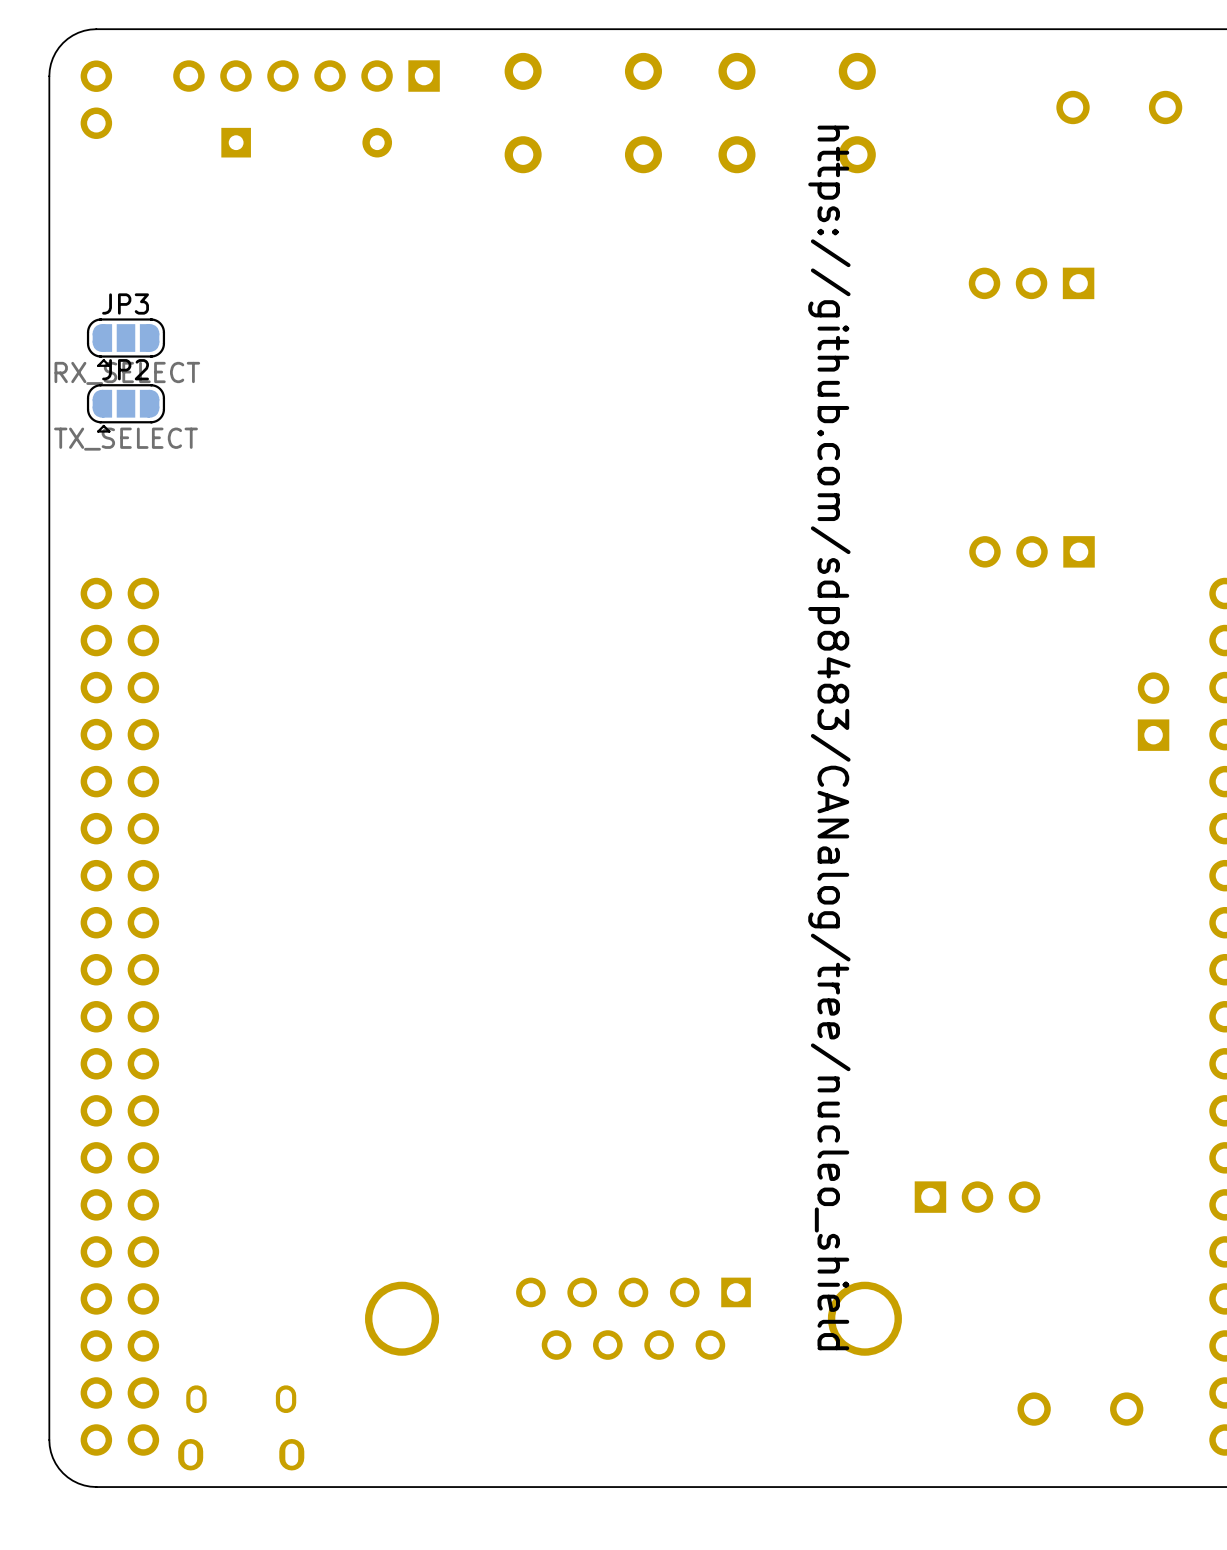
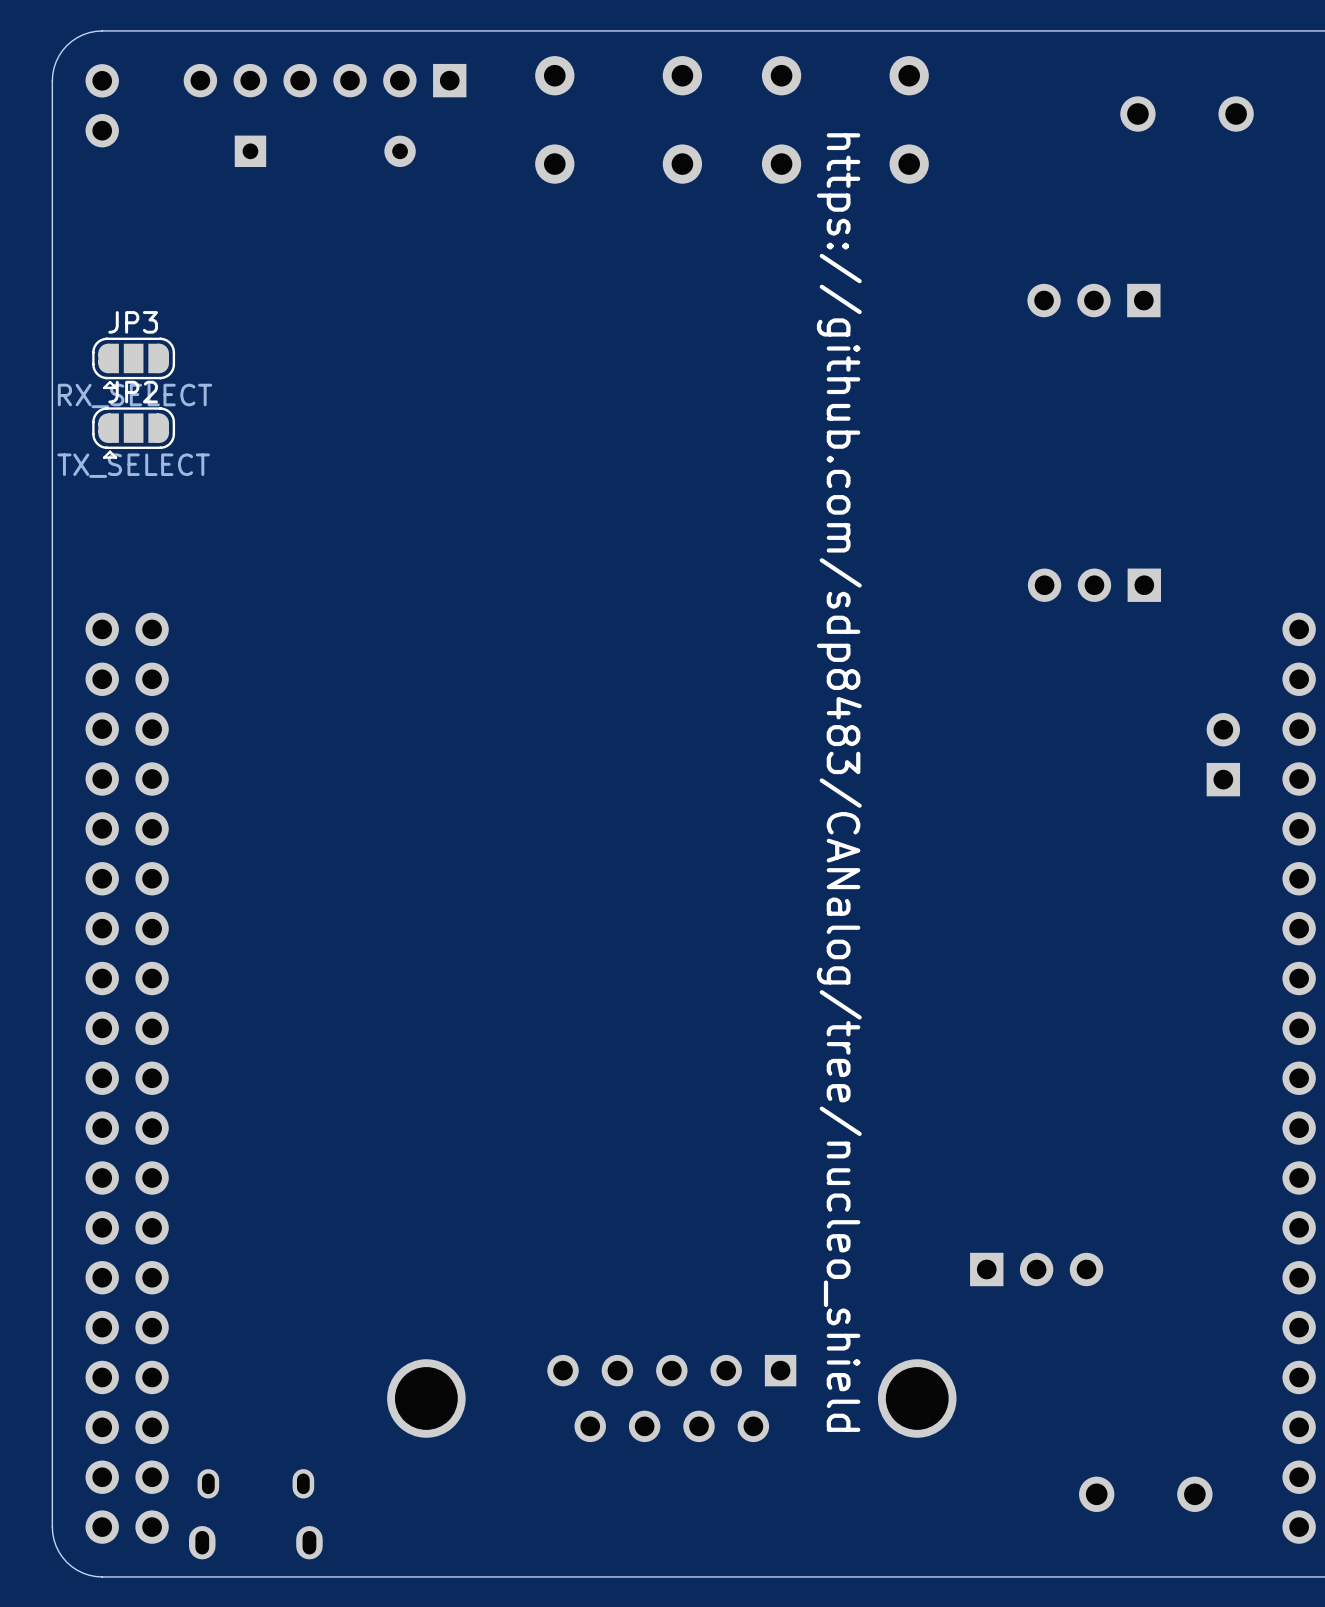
text position: https://github.com/sdp8483/CANalog/tree/nucleo_shield (829, 737) -> https://github.com/sdp8483/CANalog/tree/nucleo_shield (839, 782)

